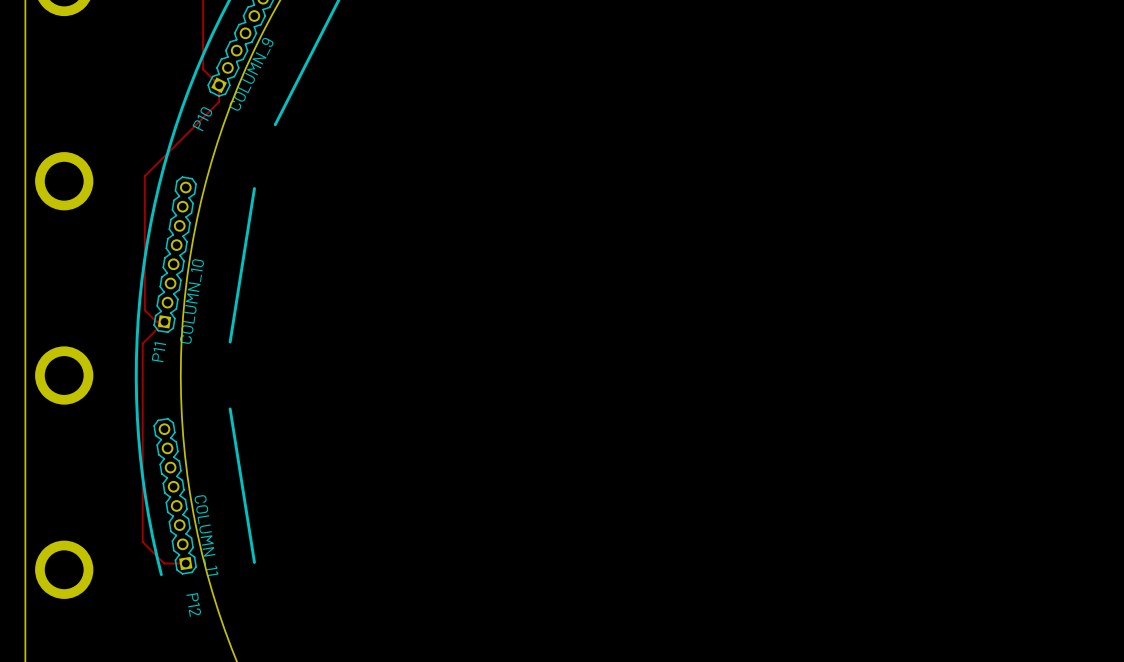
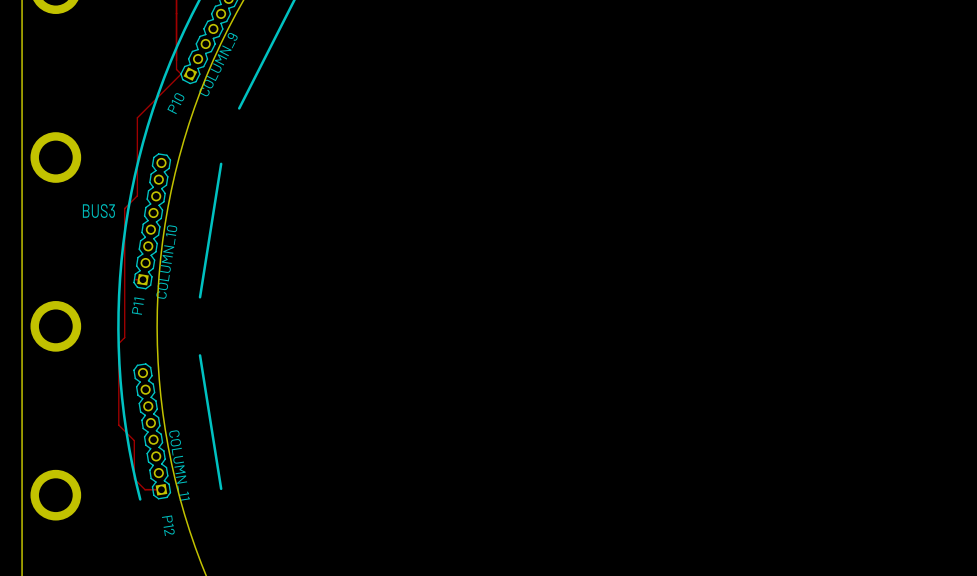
track: (203, 69) (219, 85) (219, 101) (144, 176) (144, 310) (156, 321) -> (176, 60) (176, 69) (181, 74) (137, 117) (137, 195) (124, 208) (124, 337) (118, 343) (118, 425) (134, 440) (134, 478) (145, 489)
text: none -> BUS3 (98, 211)
track: (164, 321) (142, 343) (142, 542) (164, 563) (166, 563) -> none

